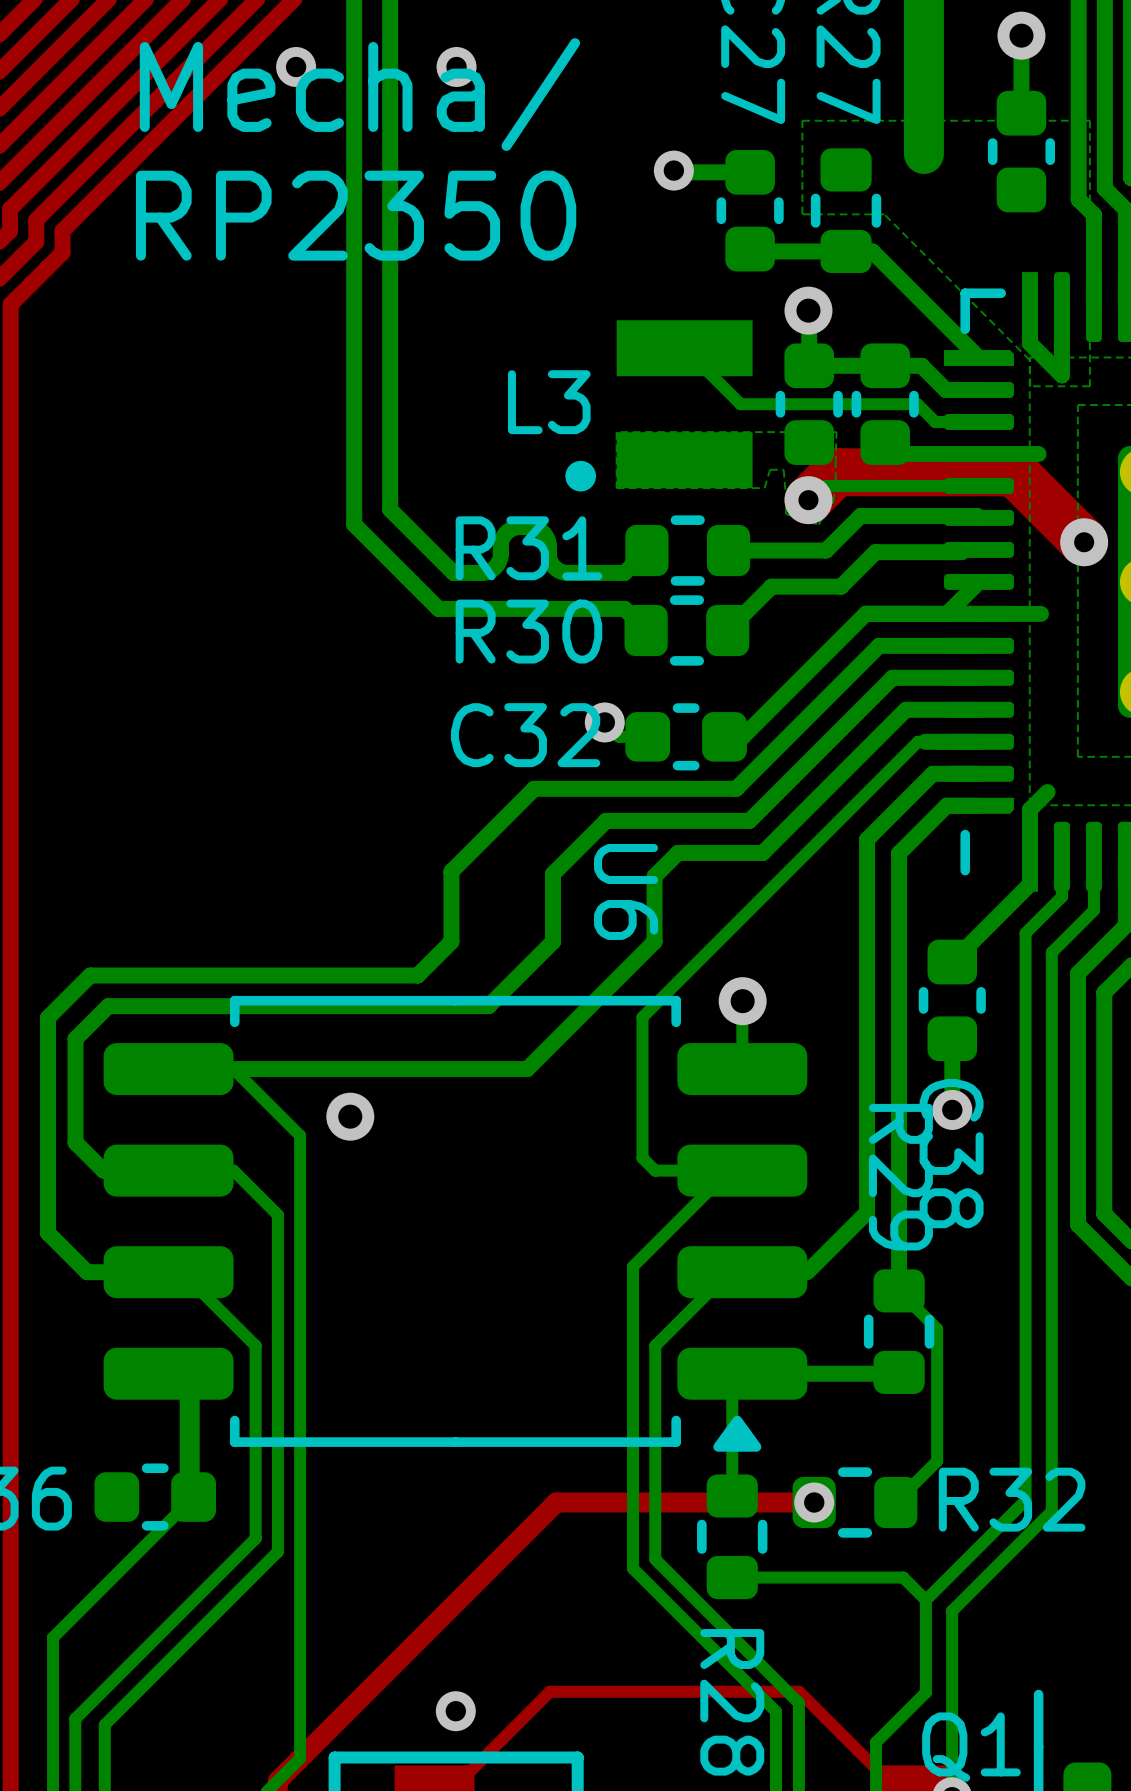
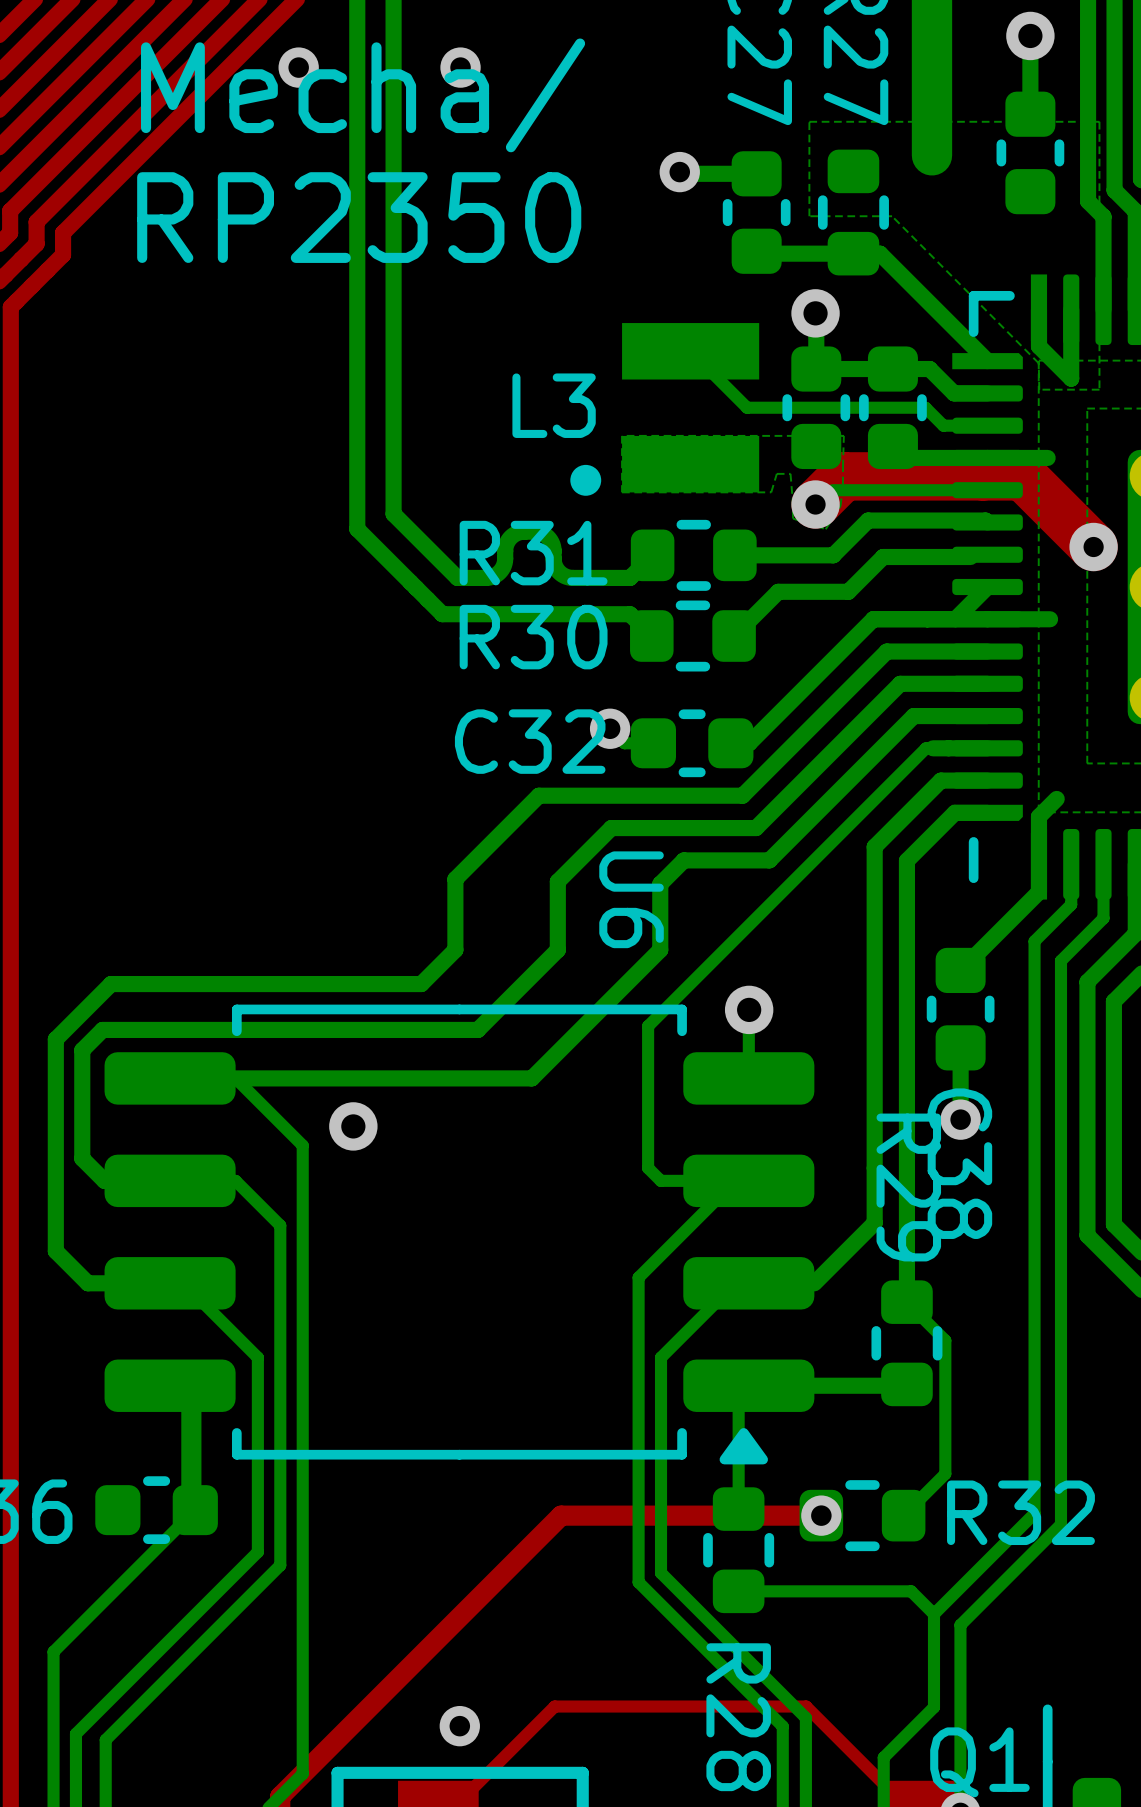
bottom track: (110, 975) (90, 975) (48, 1017) (48, 1233) (55, 1240) -> (111, 984) (55, 1039) (55, 1251)
bottom track: (488, 1006) (108, 1006) (75, 1038) (75, 1142) (81, 1148) -> (492, 1014) (477, 1029) (102, 1029) (82, 1050) (82, 1158)

